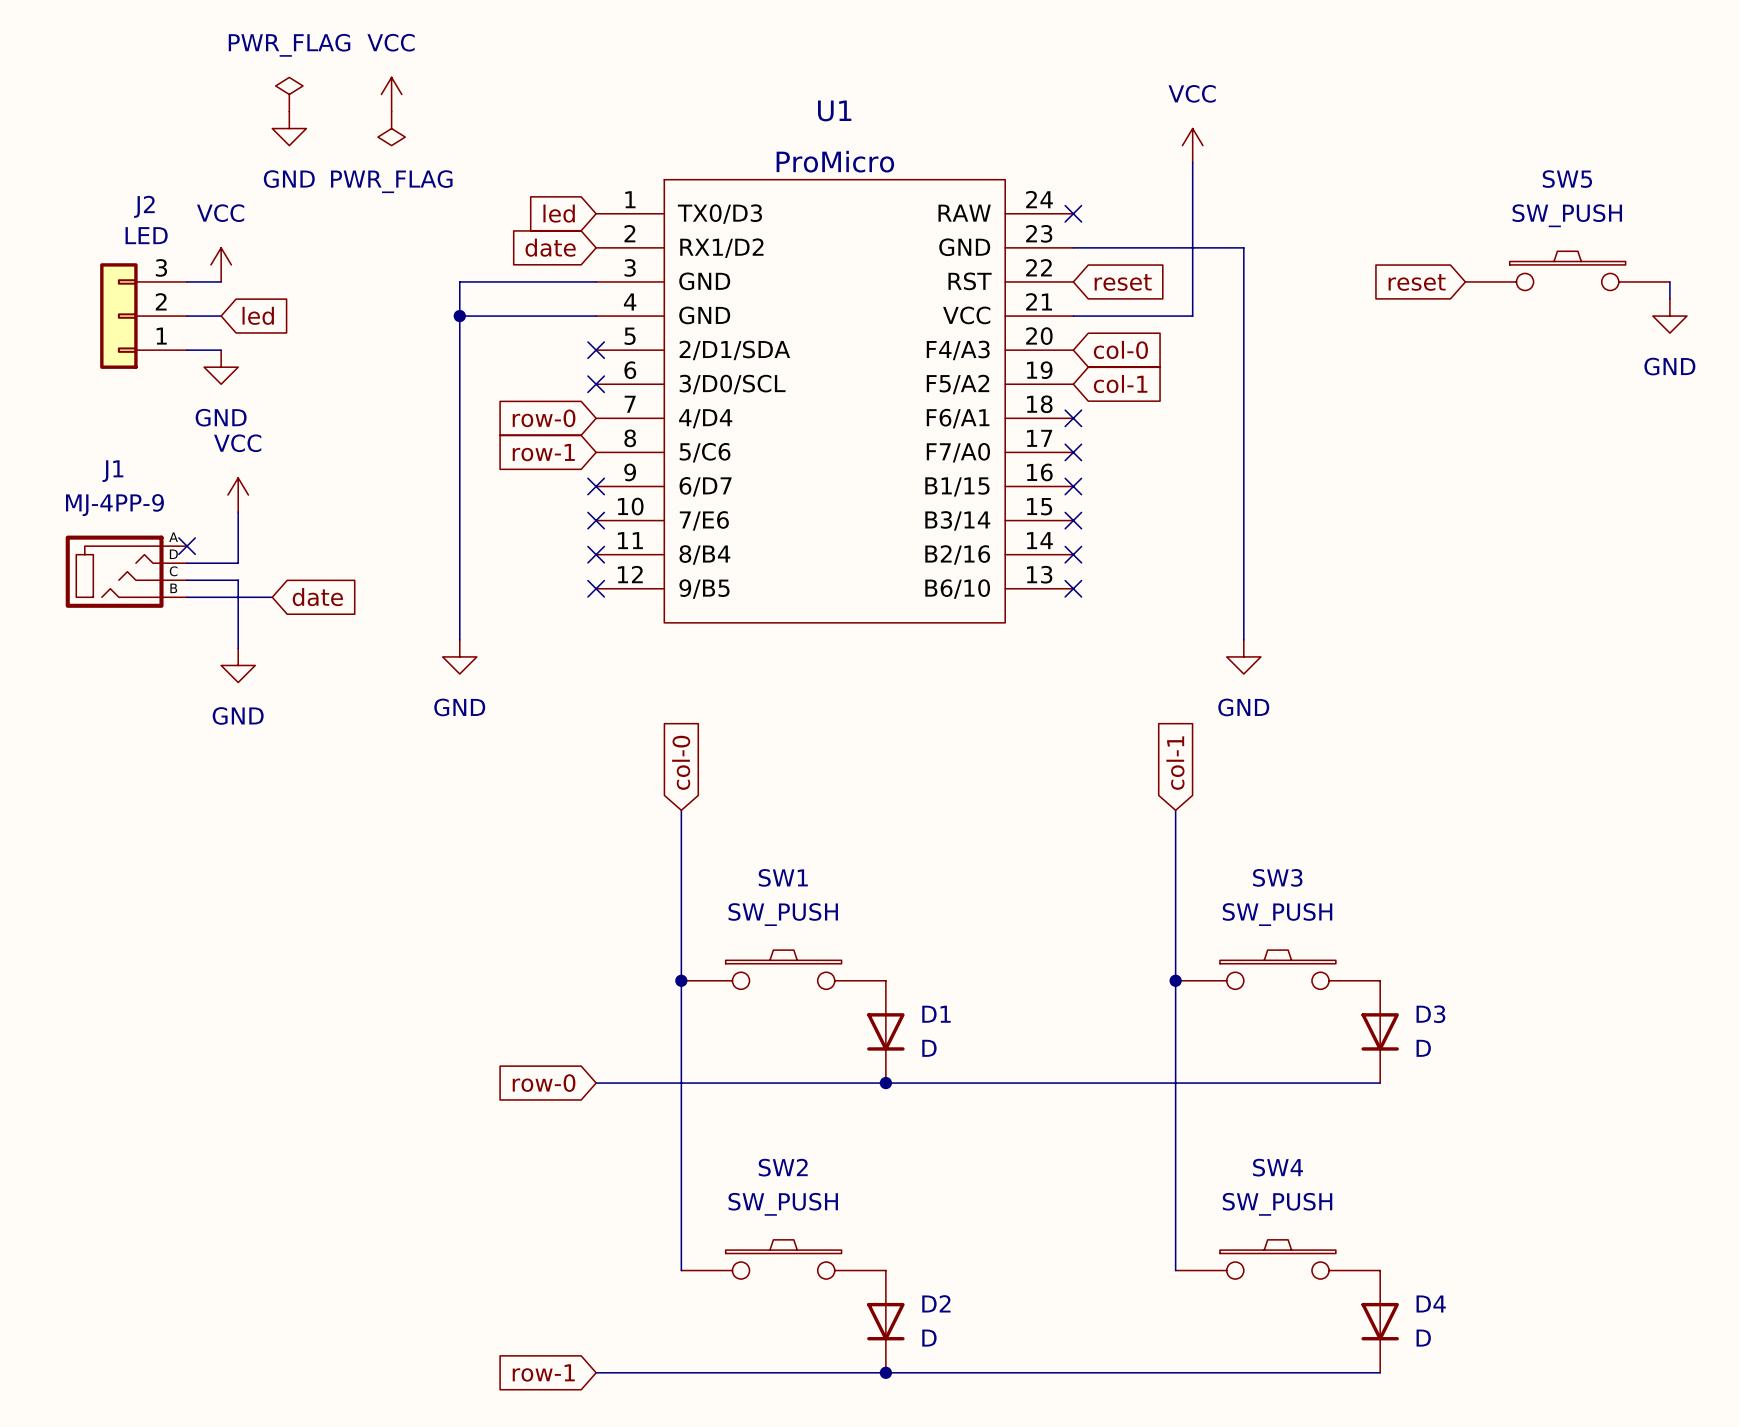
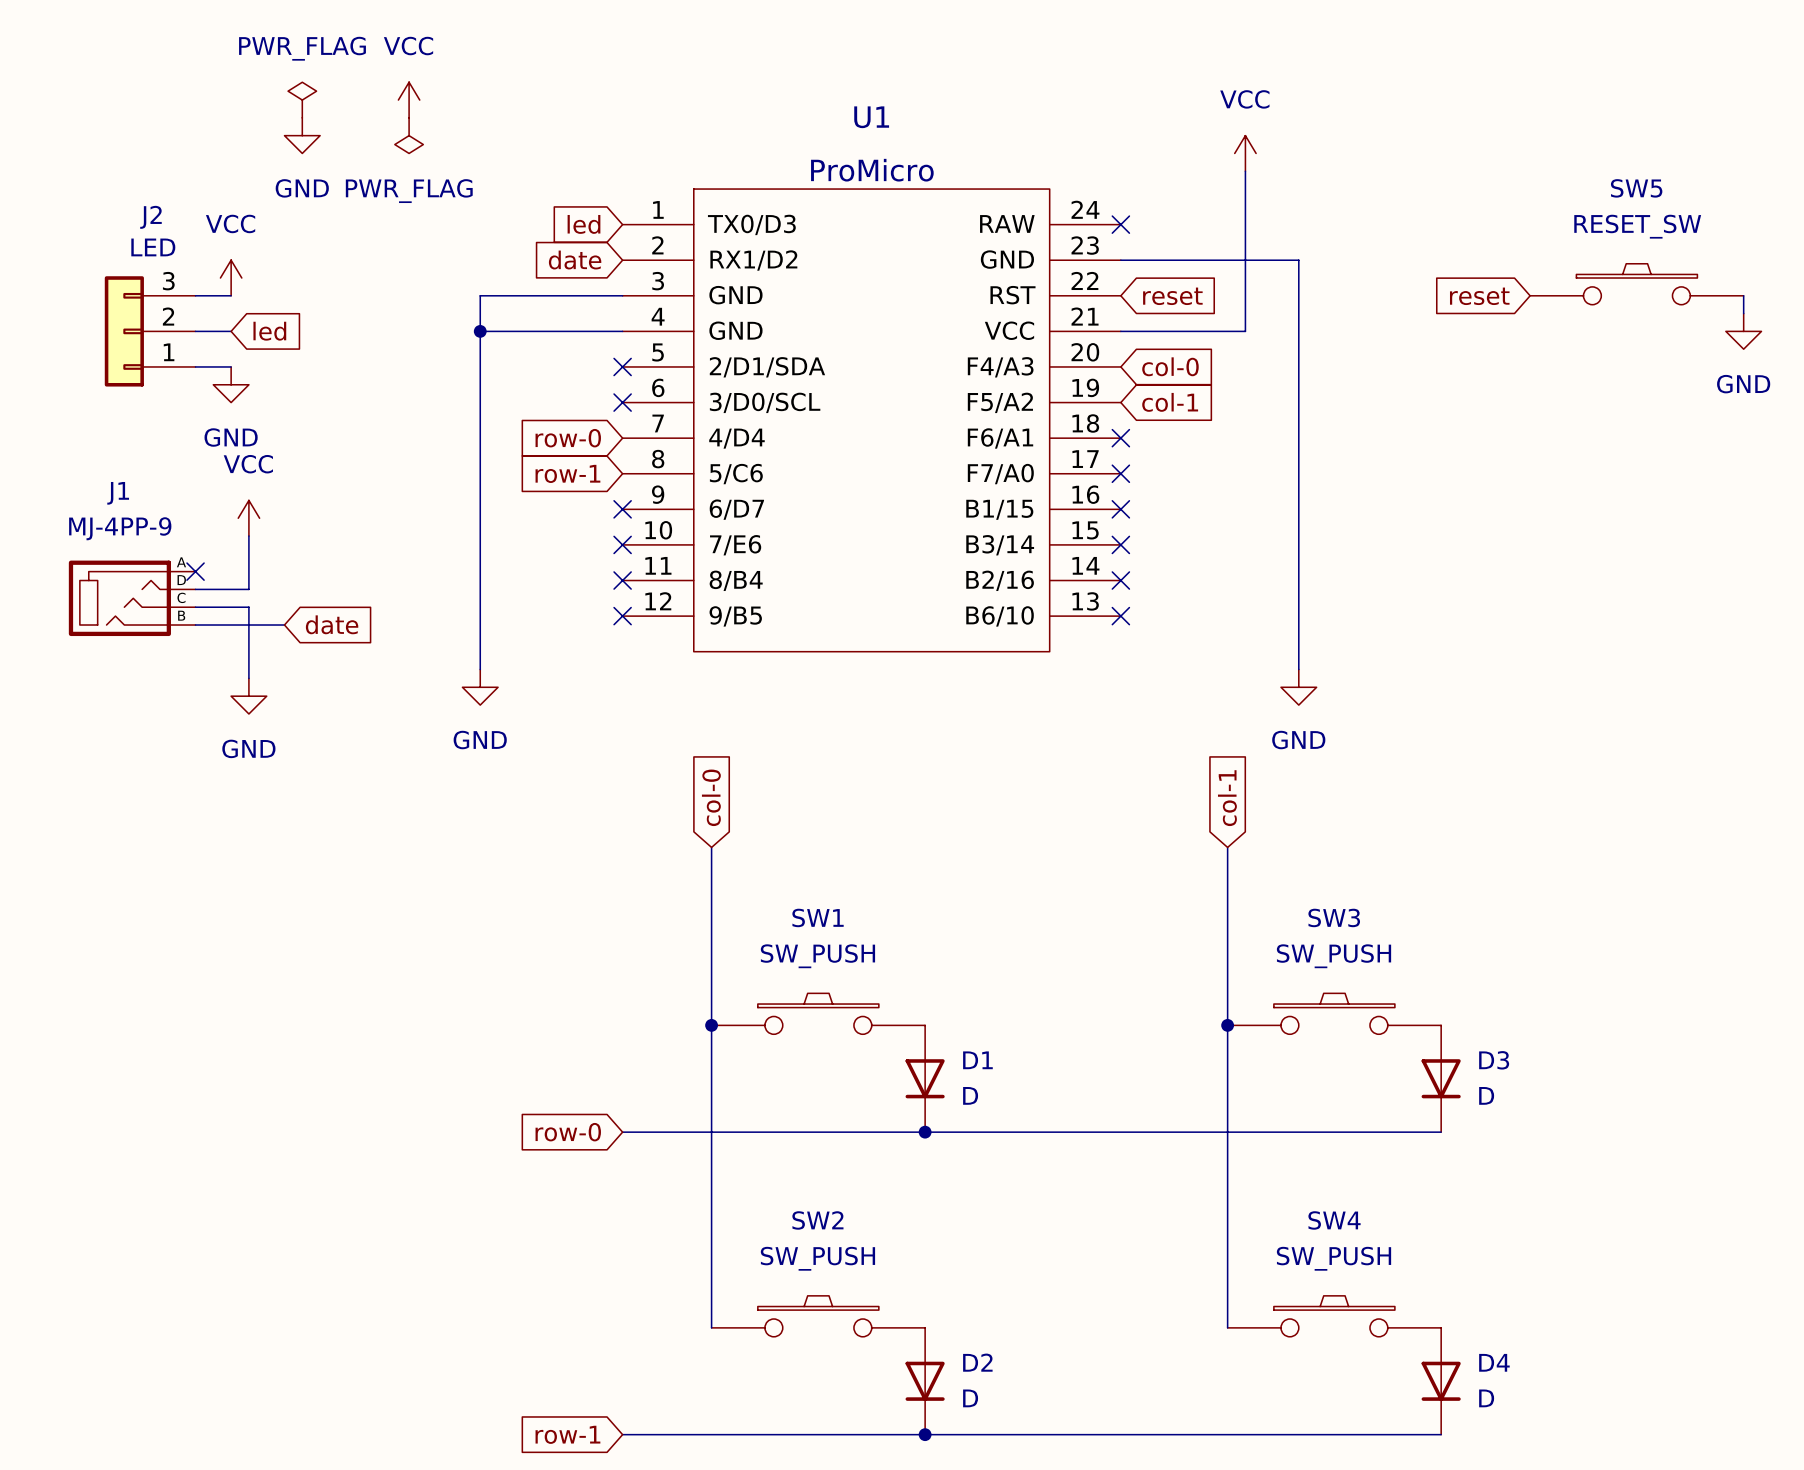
SW5 value: SW_PUSH (1567, 215) -> RESET_SW (1637, 226)

